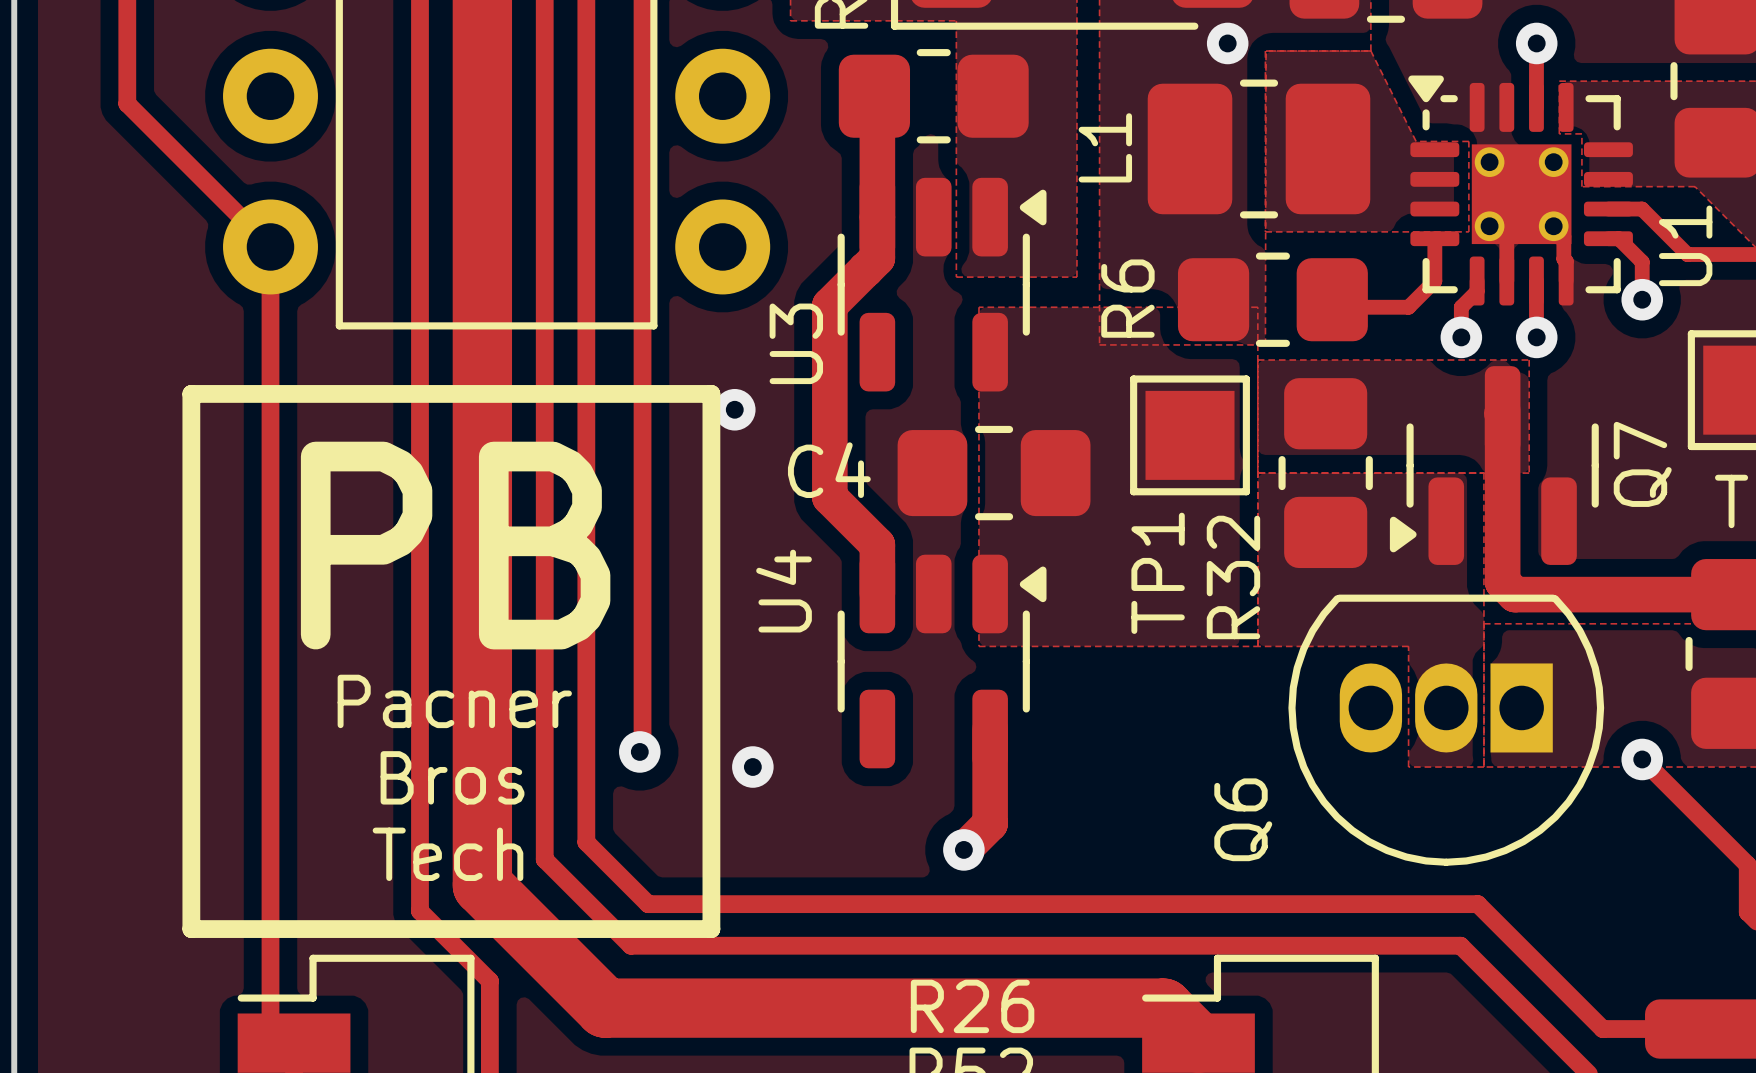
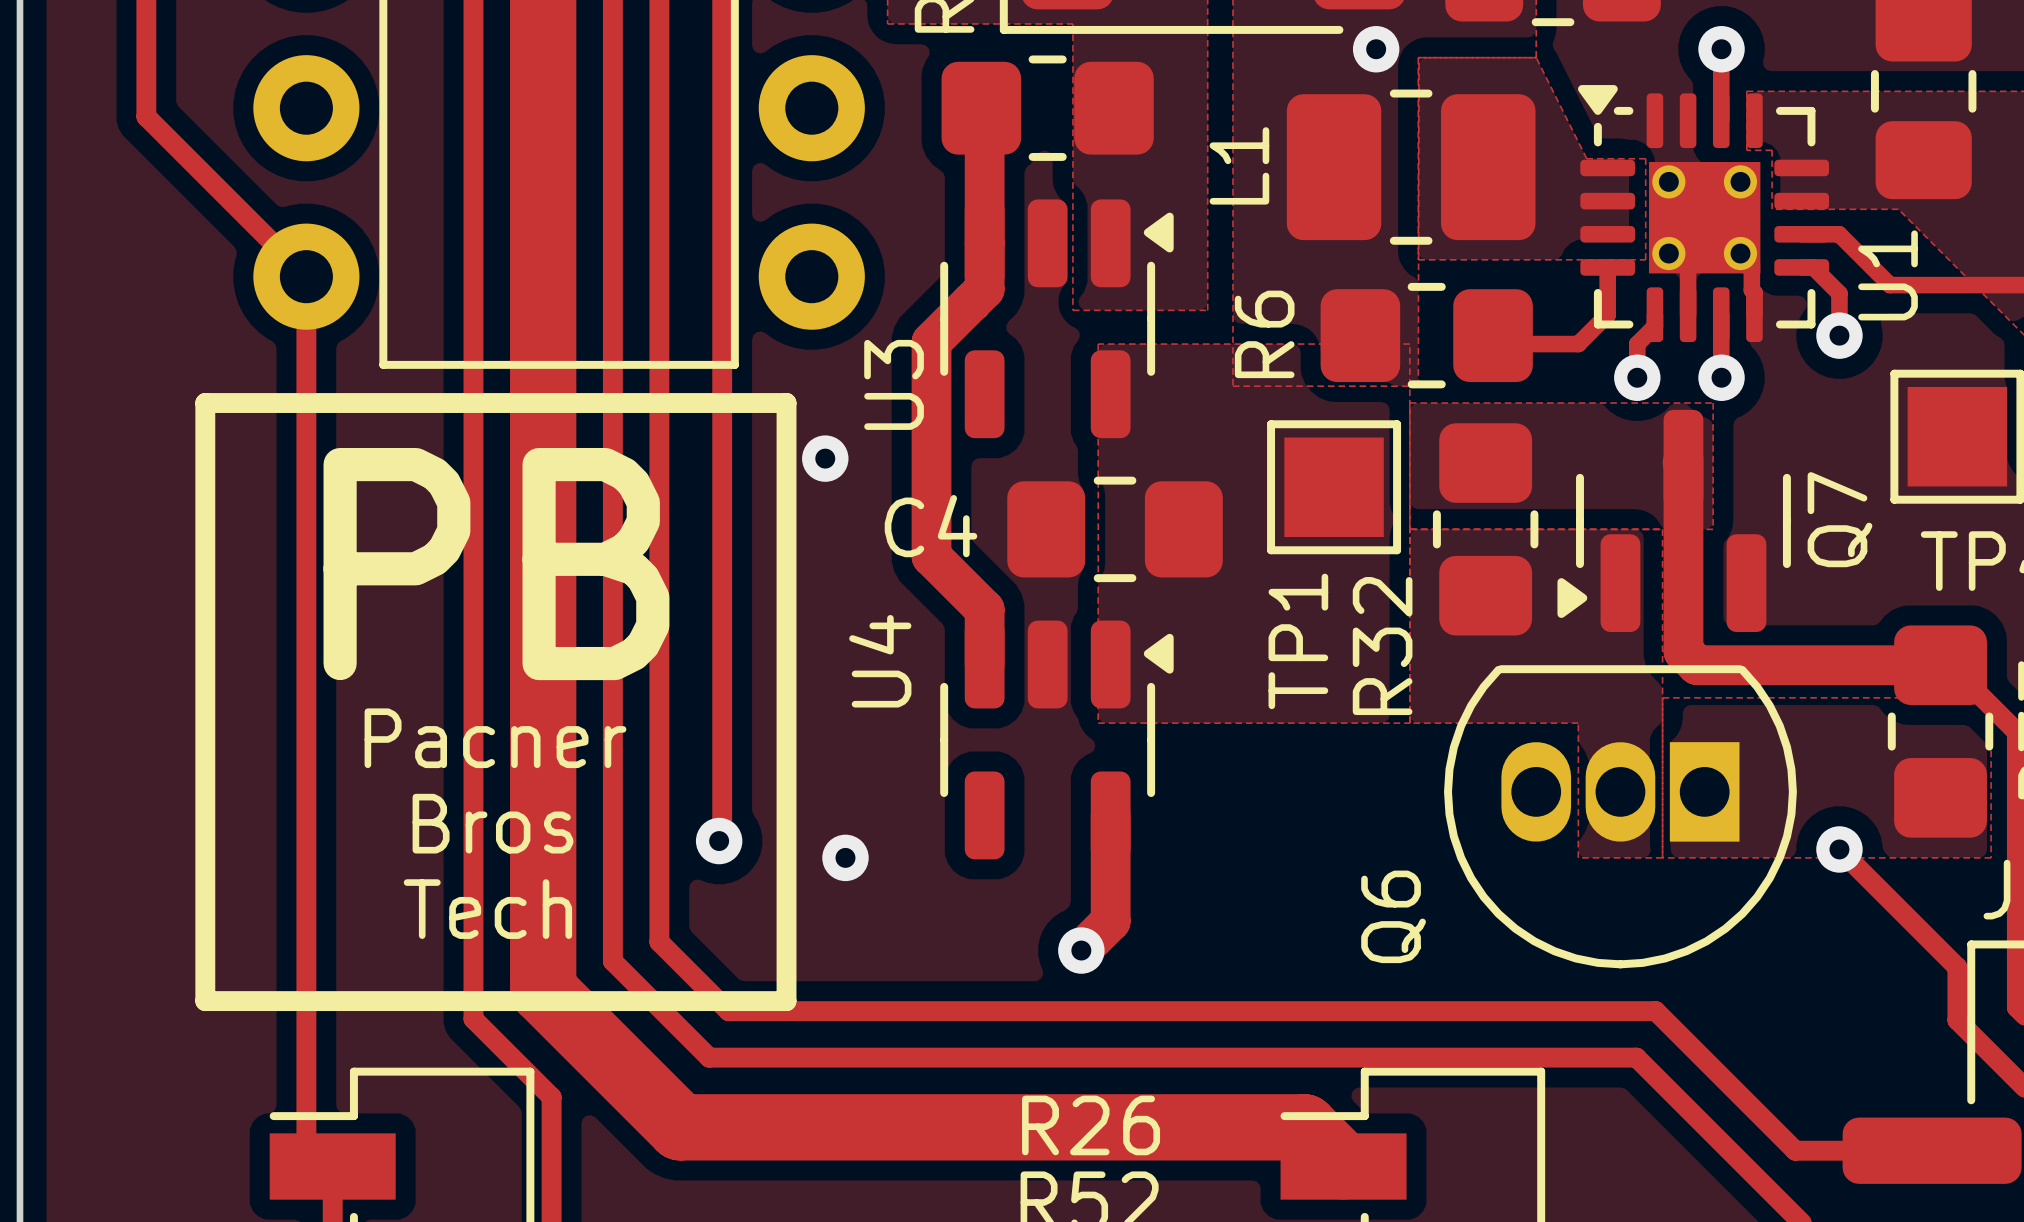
line: (191, 393) (711, 393) (711, 929) (191, 929) (191, 393) -> (205, 403) (786, 403) (786, 1001) (205, 1001) (205, 403)
text position: PB (455, 545) -> PB (496, 564)
text position: Pacner (454, 701) -> Pacner (495, 738)
text position: Bros (452, 777) -> Bros (492, 823)
text position: Tech (447, 854) -> Tech (487, 909)

